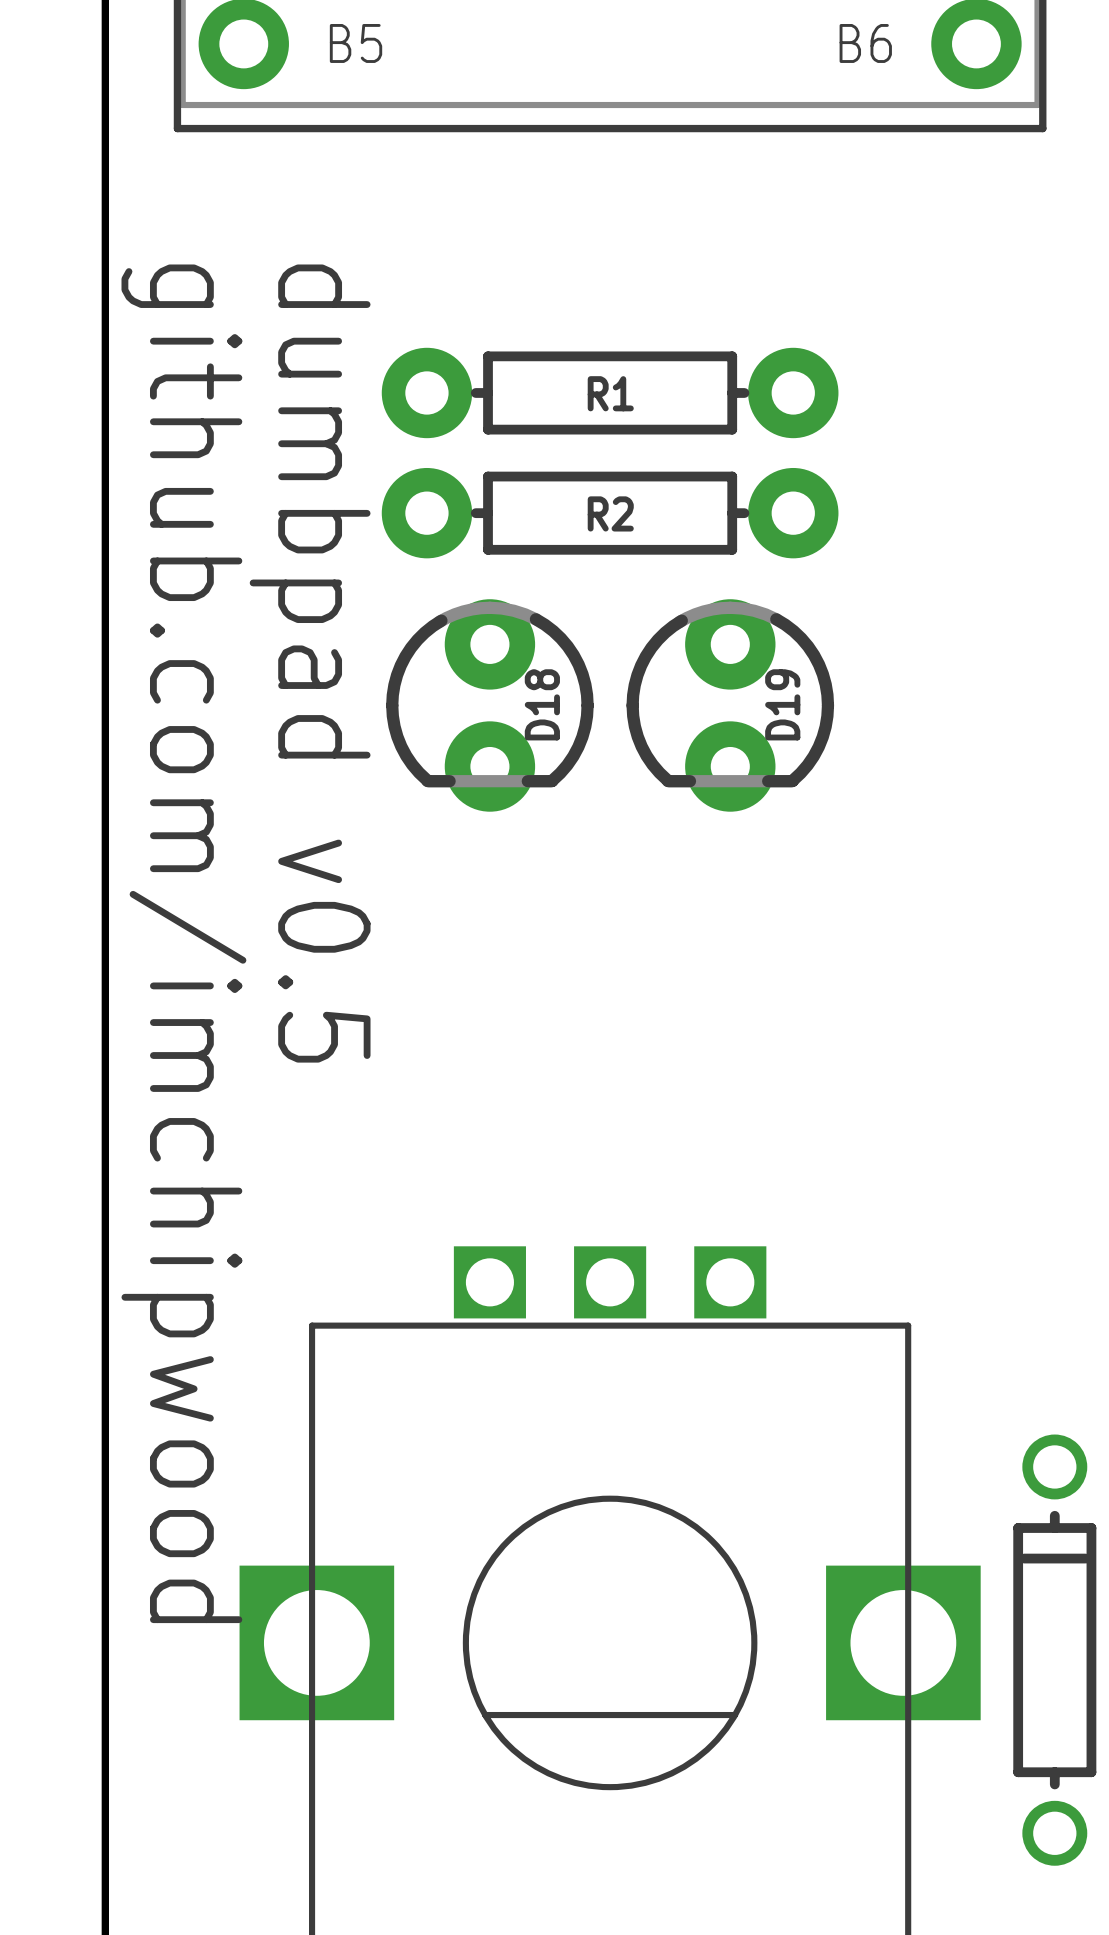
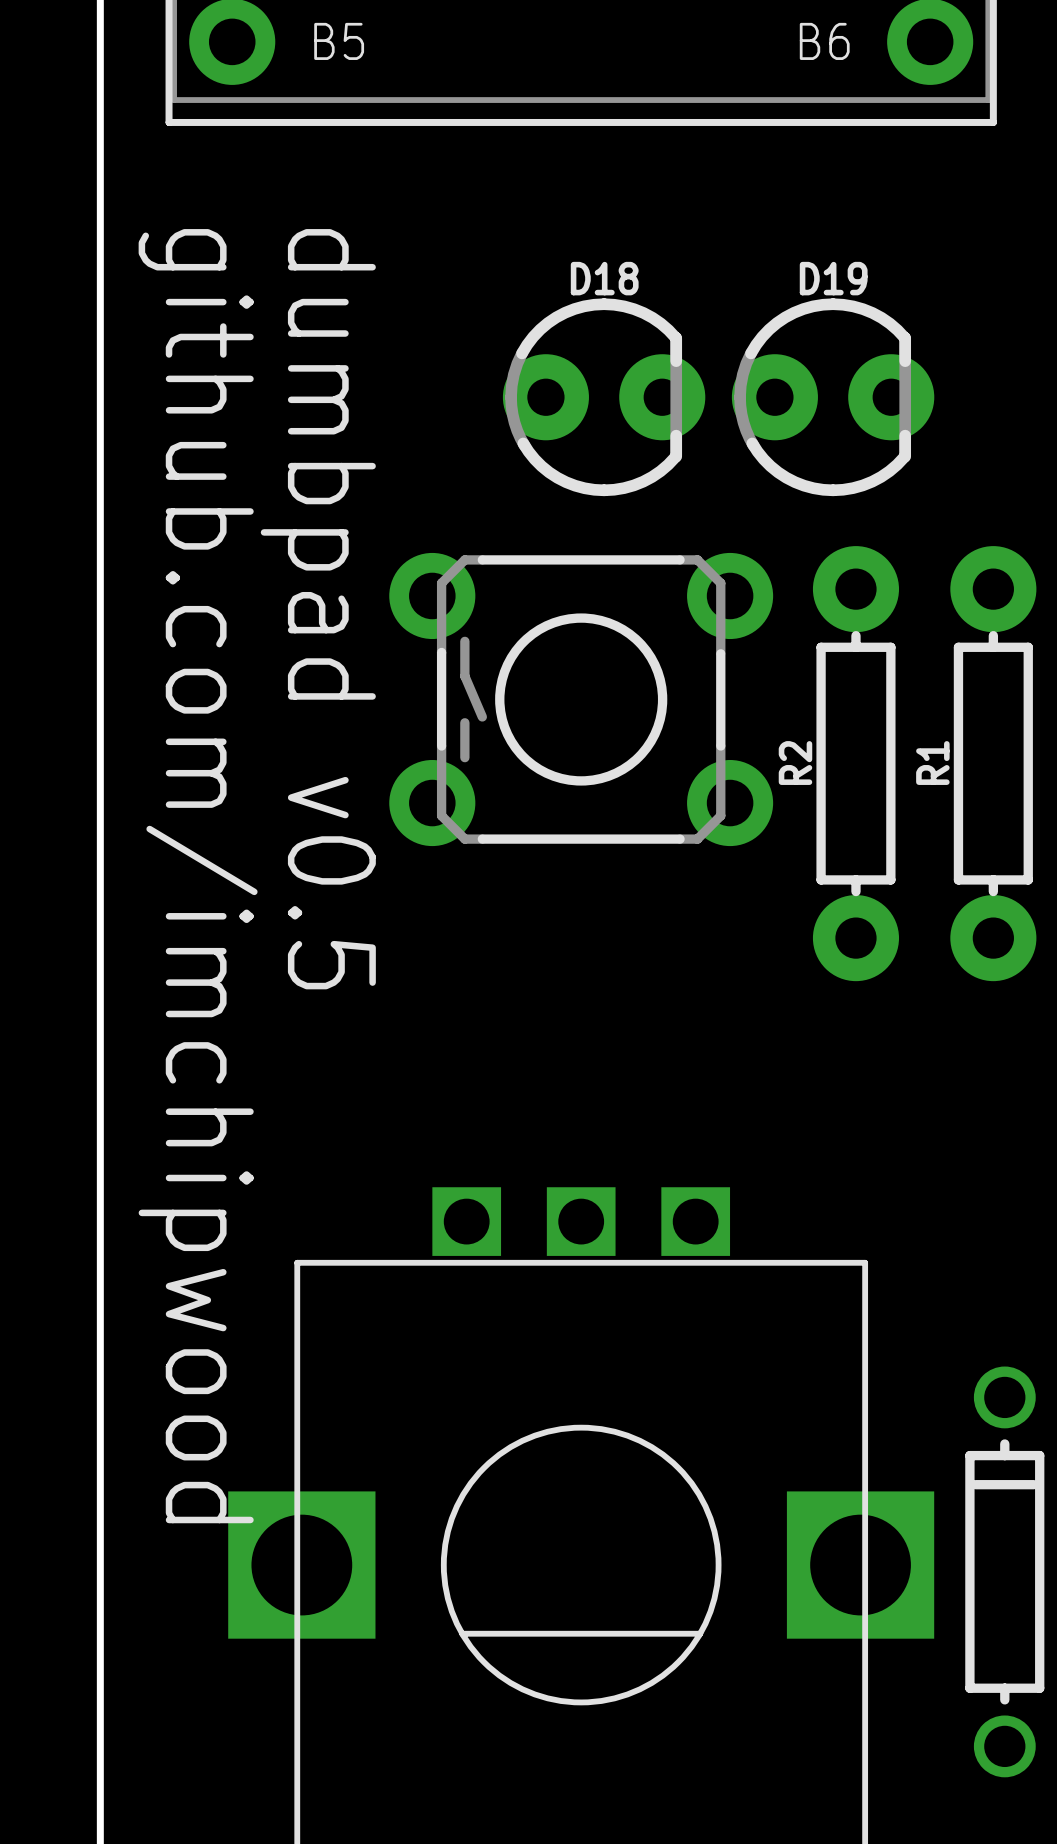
R1 rotation: 0° (610, 392) -> 90° clockwise (993, 763)
R1 position: (610, 392) -> (993, 763)
R2 rotation: 0° (610, 513) -> 90° clockwise (855, 763)
R2 position: (610, 513) -> (855, 763)
text position: dumbpad v0.5 (310, 663) -> dumbpad v0.5 (318, 609)
D18 rotation: 0° (489, 705) -> 90° counterclockwise (604, 397)
D18 position: (489, 705) -> (604, 397)
D19 rotation: 0° (730, 705) -> 90° counterclockwise (833, 397)
D19 position: (730, 705) -> (833, 397)
part: none -> (581, 699)
text position: github.com/imchipwood (183, 943) -> github.com/imchipwood (198, 876)

